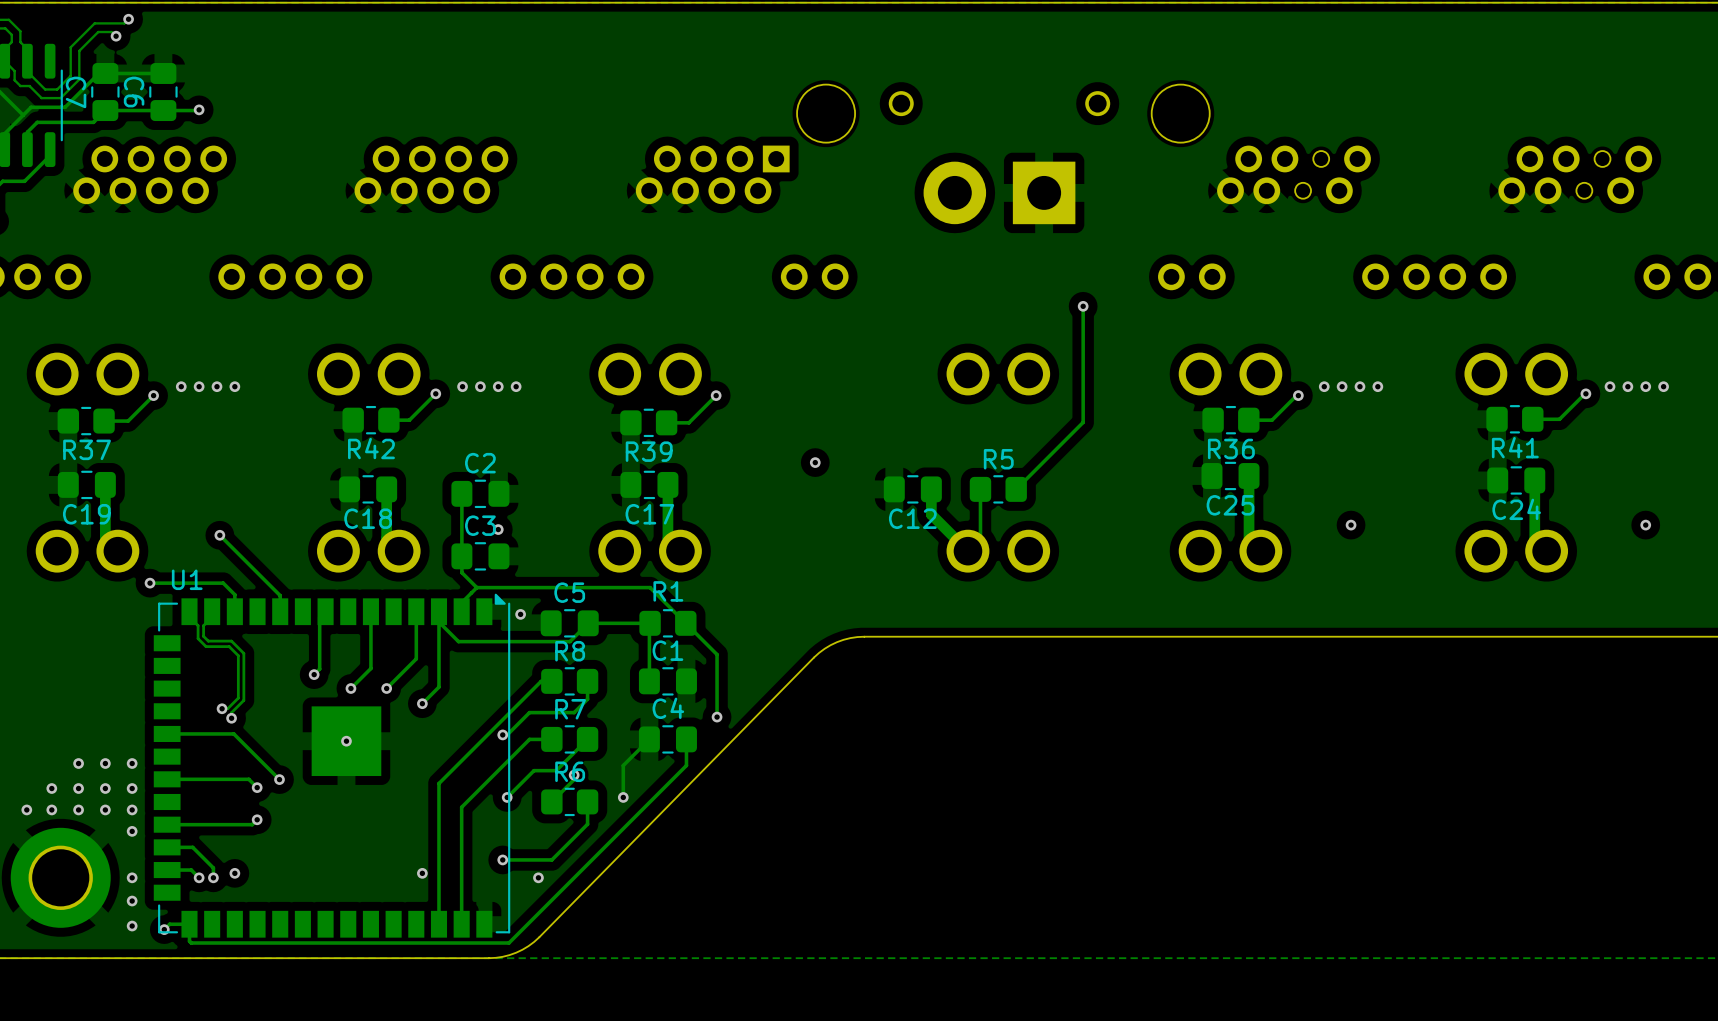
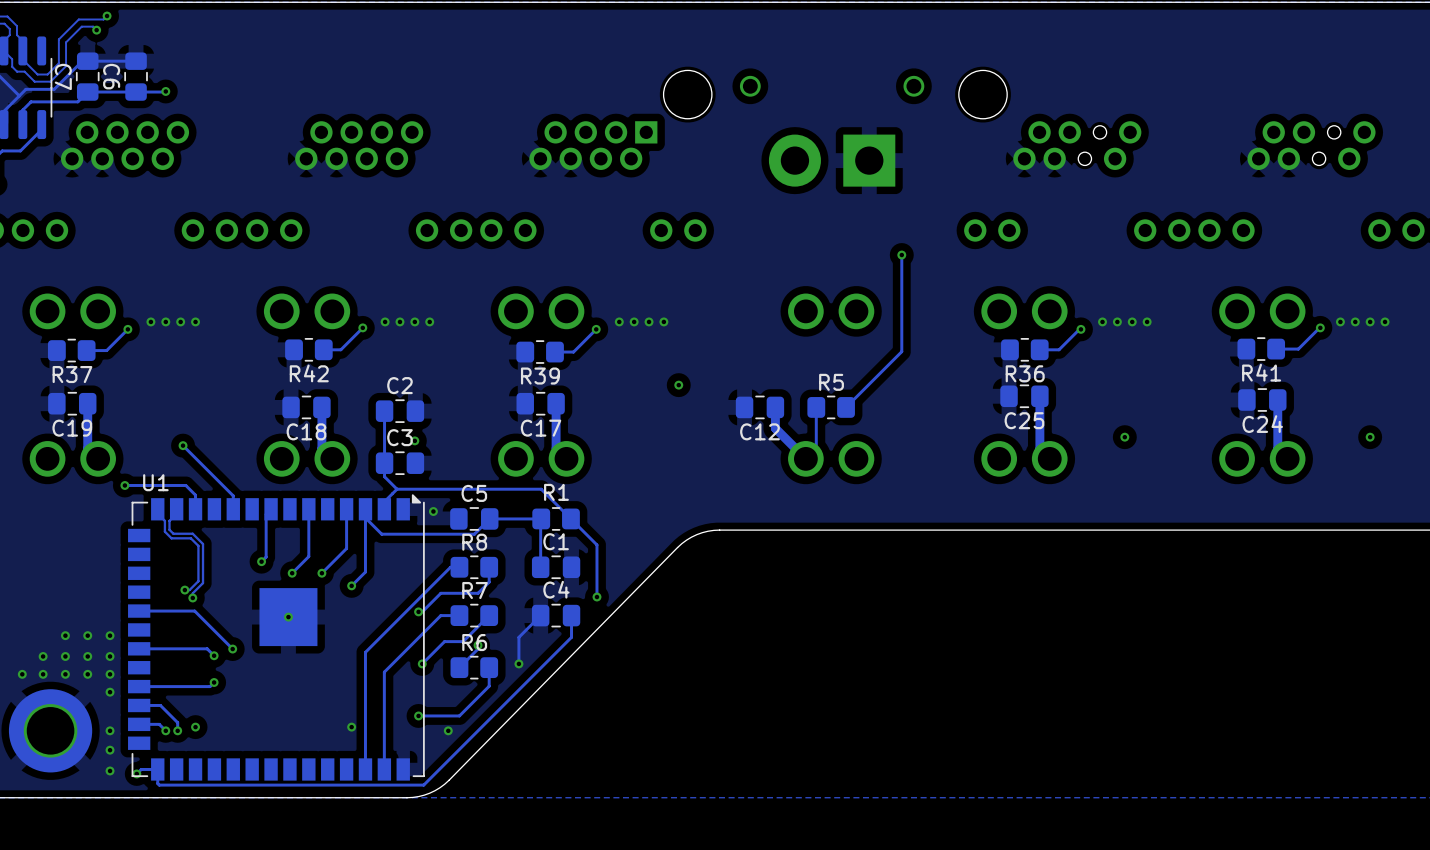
via: none -> (619, 321)
via: none -> (634, 321)
via: none -> (649, 321)
via: none -> (663, 321)

